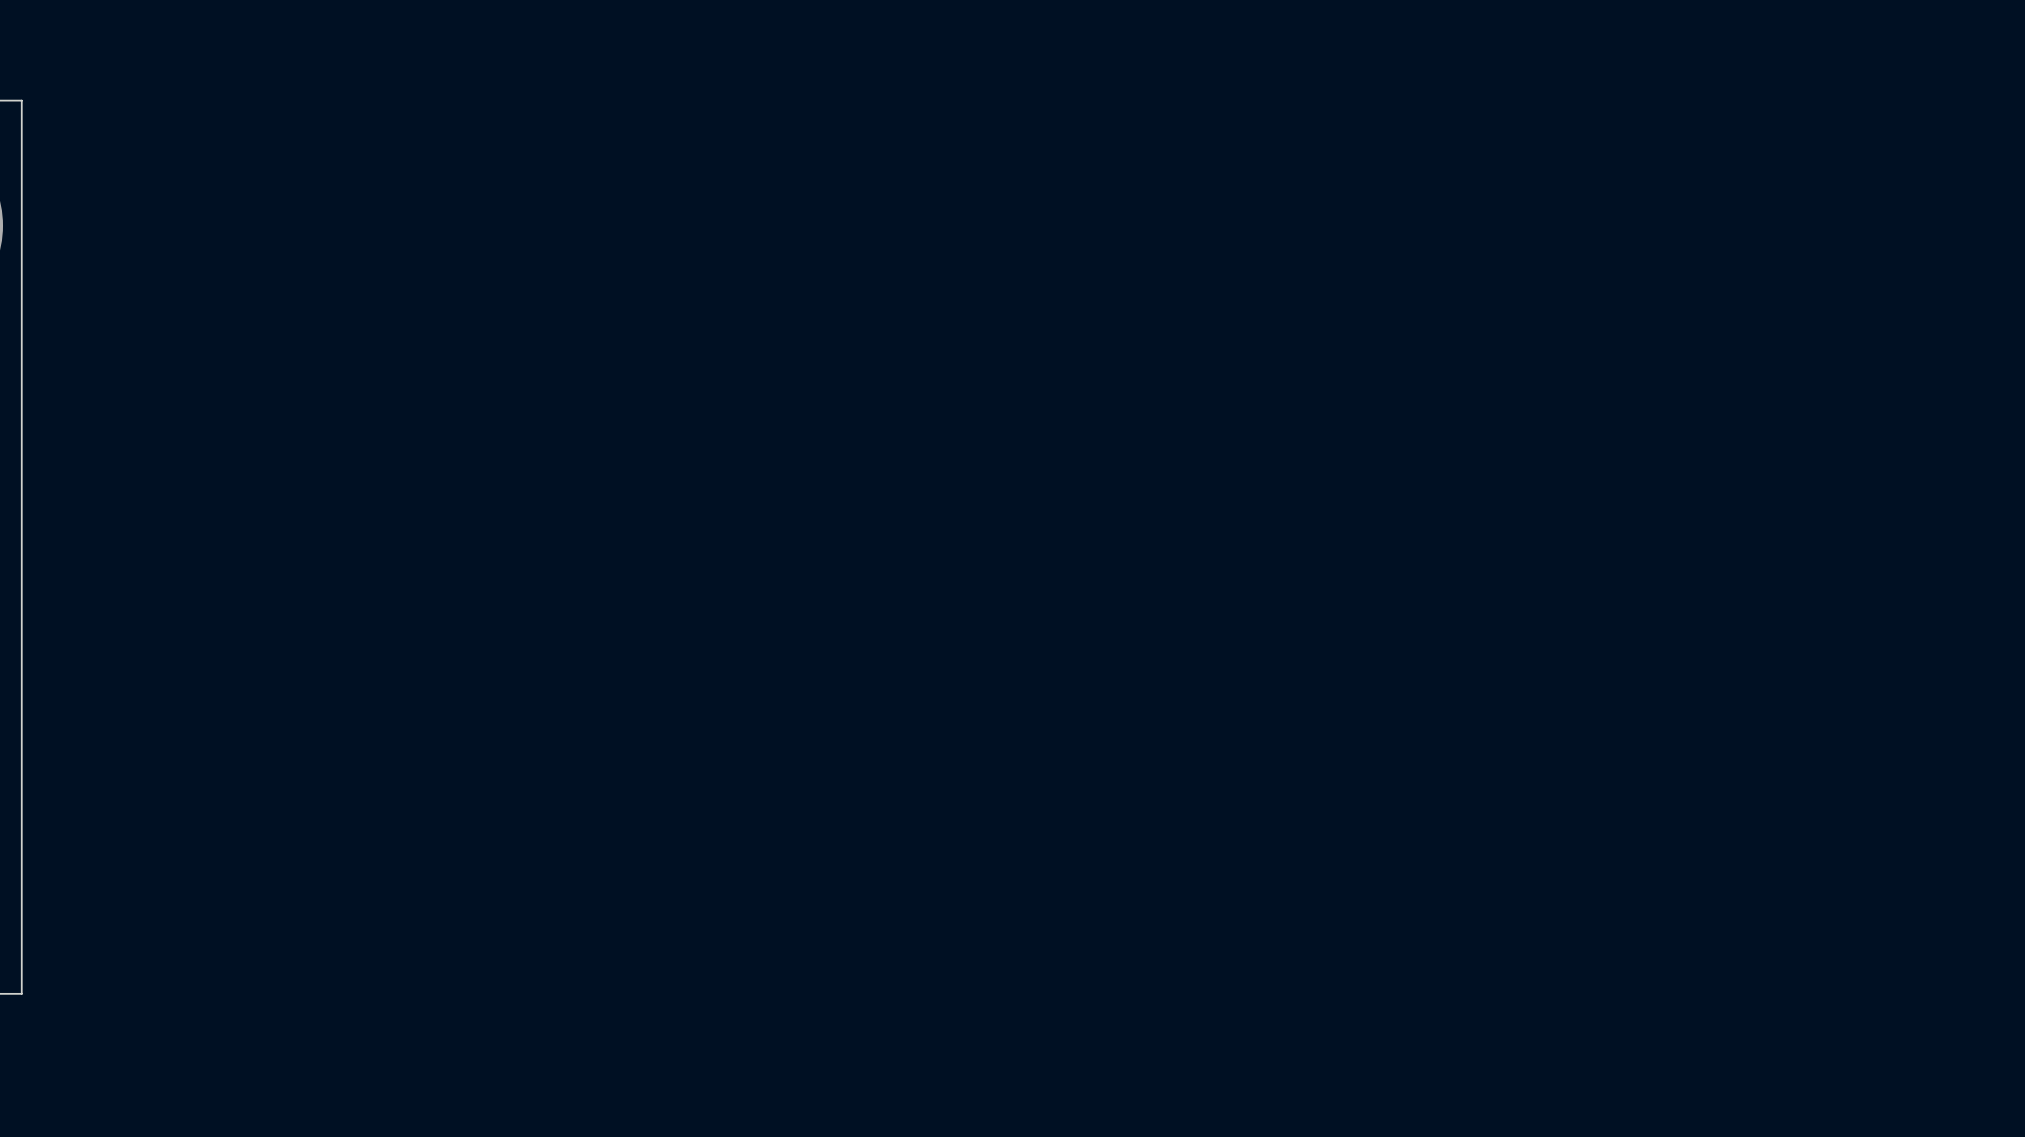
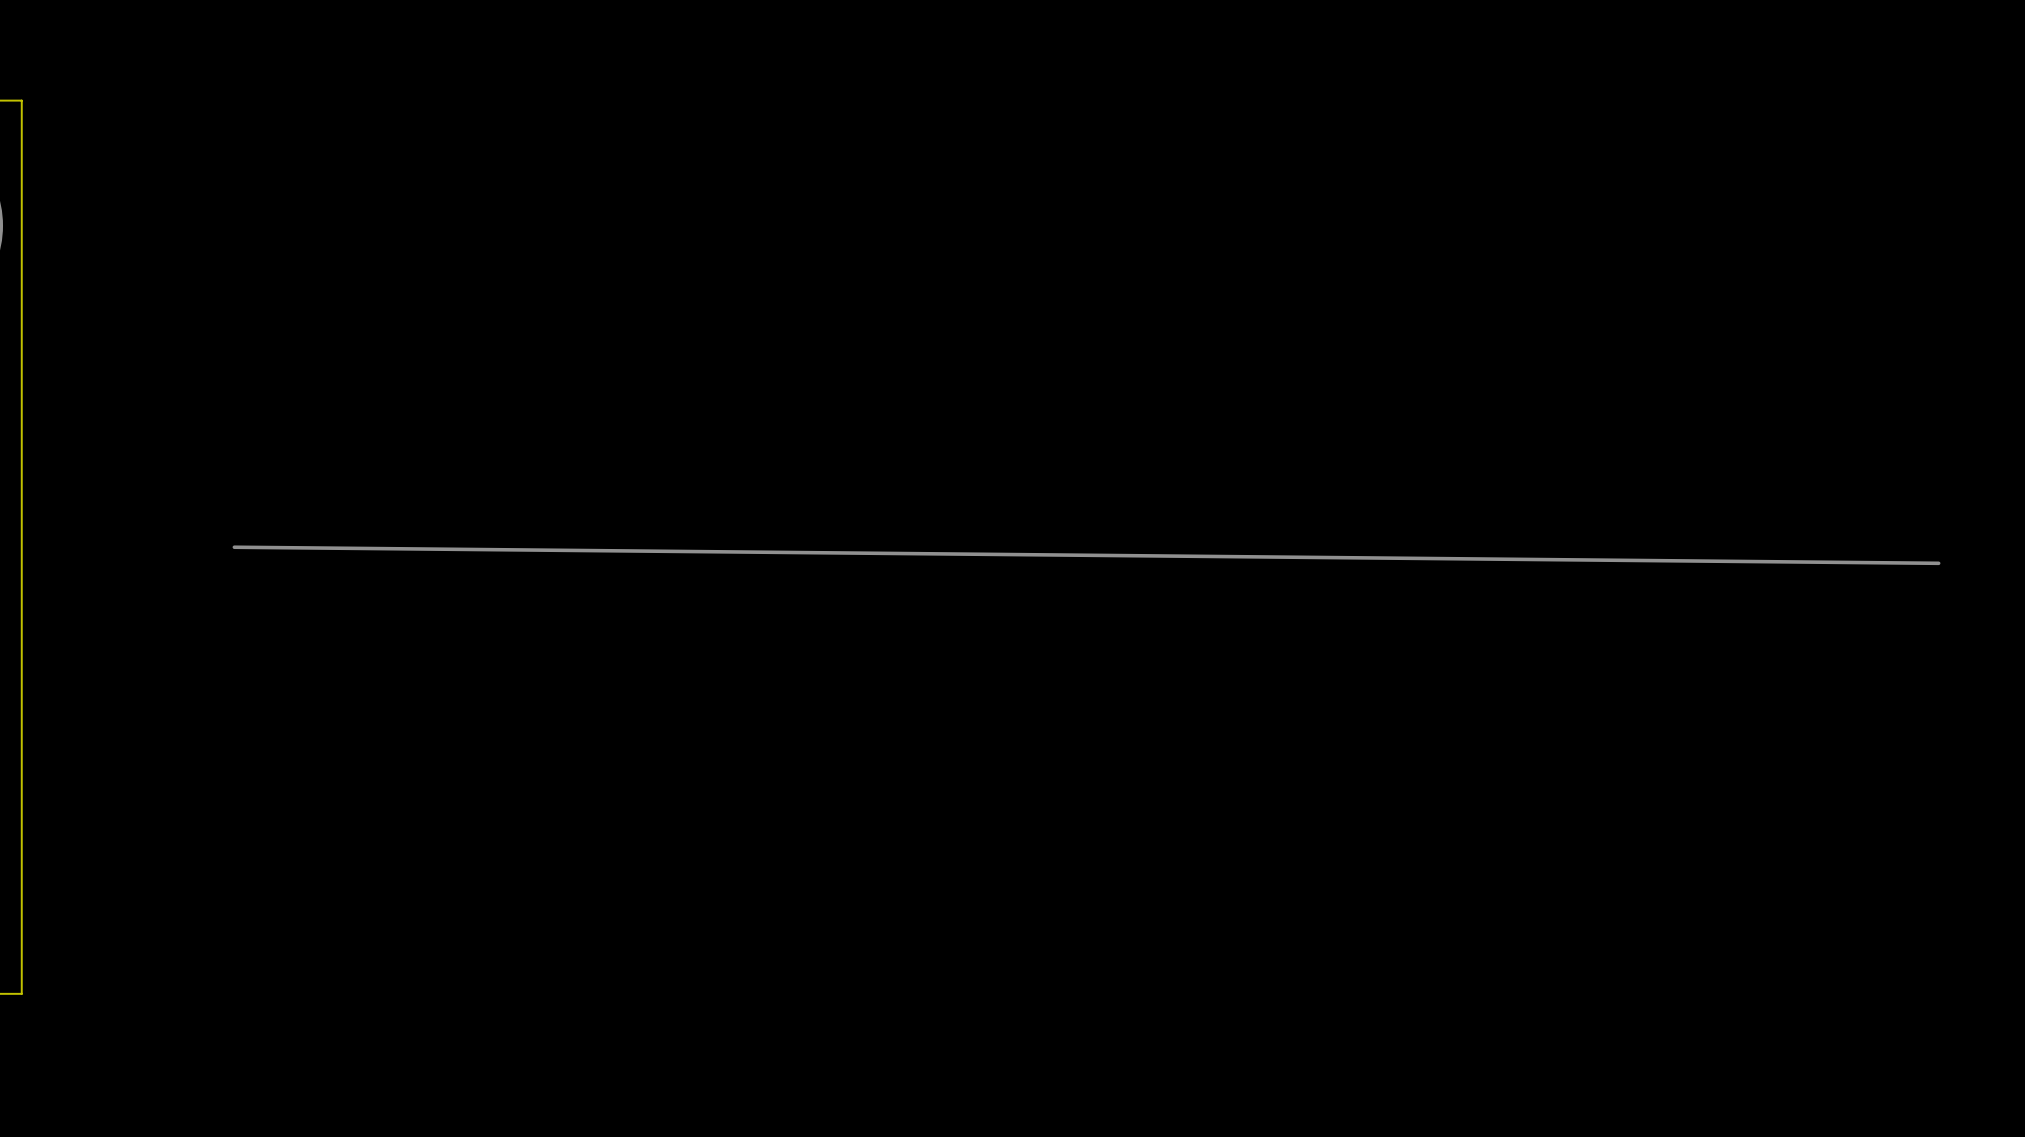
line: none -> (234, 547) (1938, 563)

